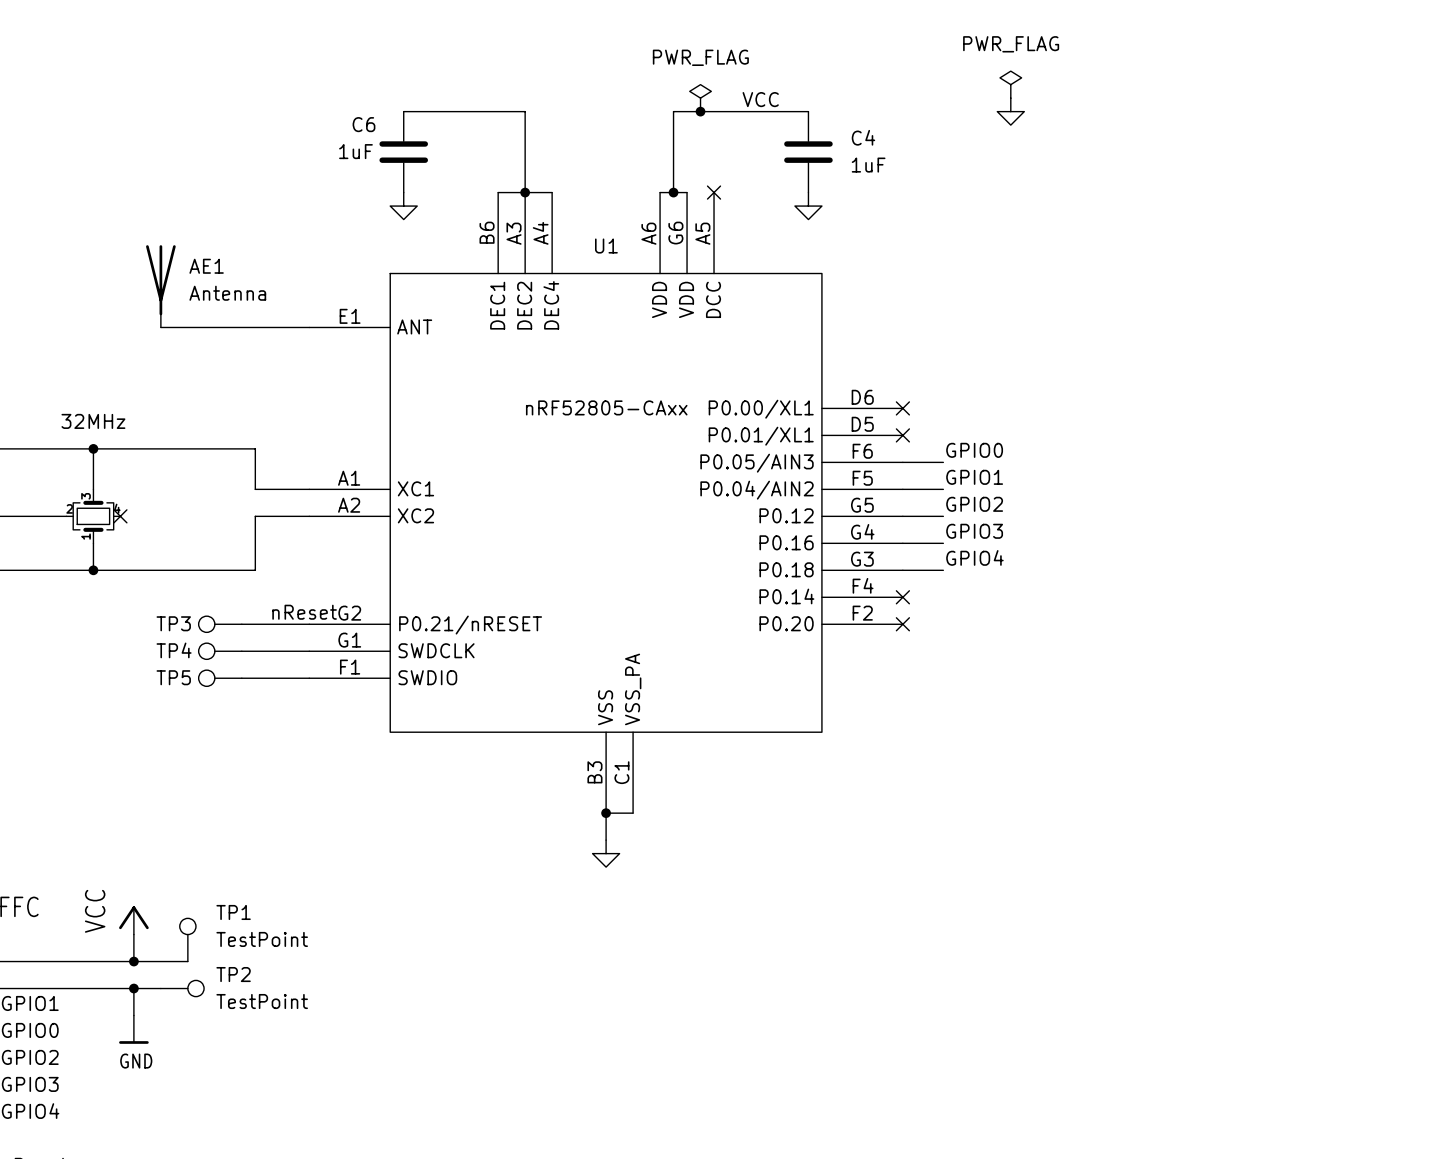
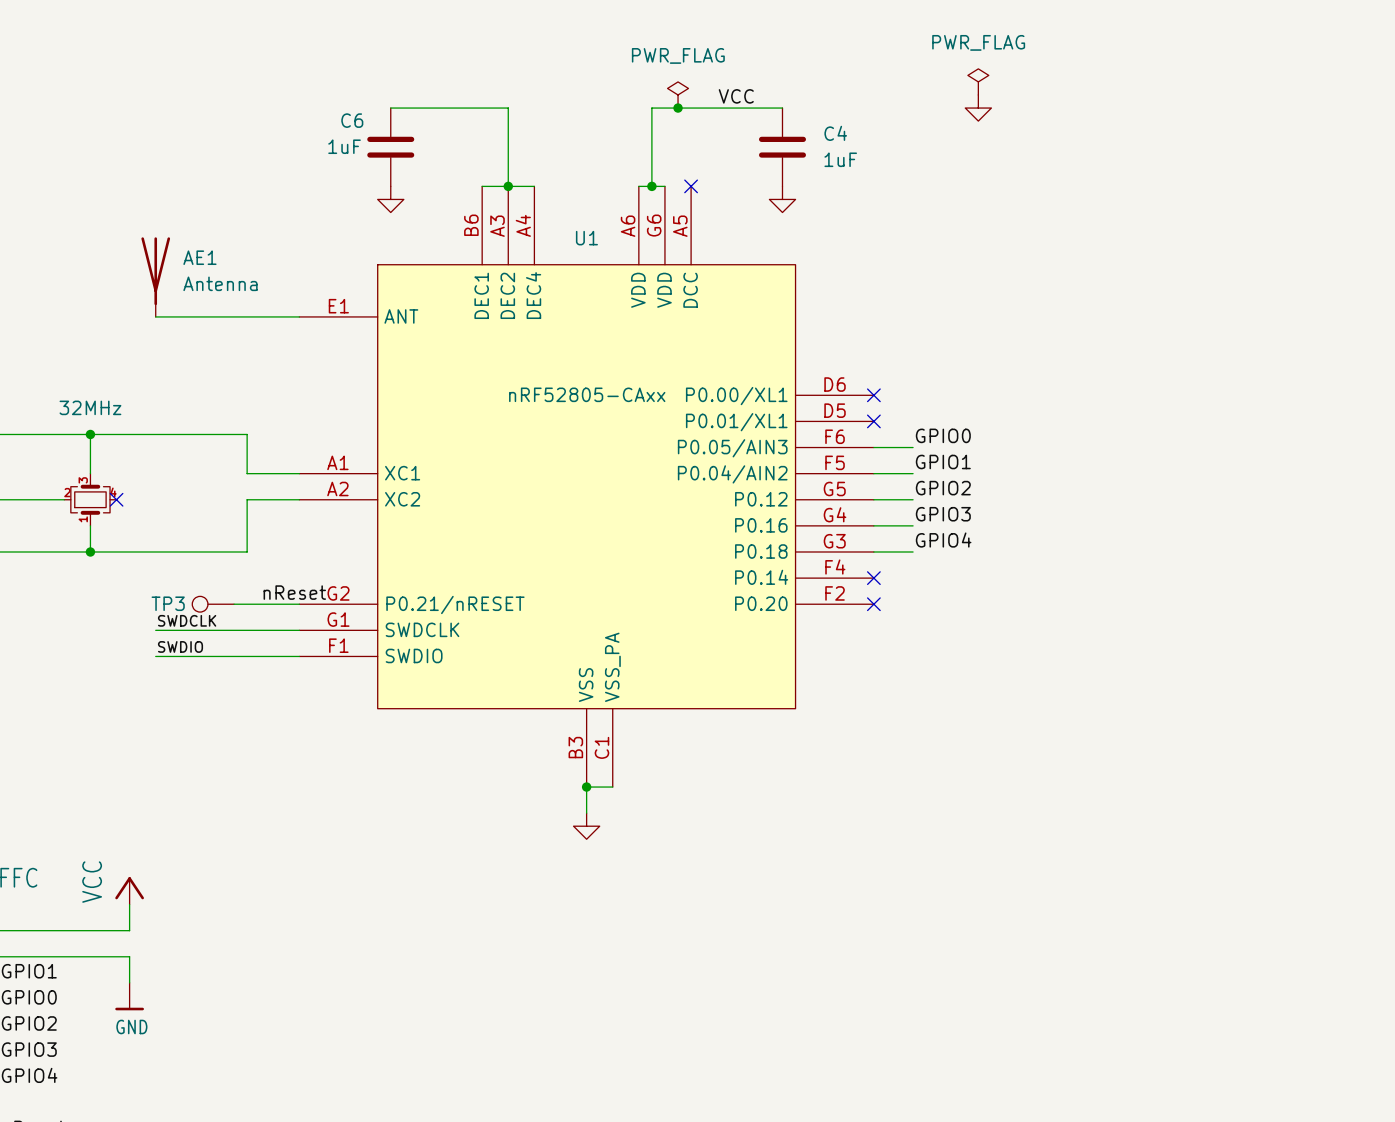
label: none -> SWDCLK (187, 620)
wire: none -> (155, 630) (234, 630)
TP4: (220, 651) -> none
label: none -> SWDIO (180, 646)
wire: none -> (155, 656) (234, 656)
TP5: (220, 678) -> none
TP1: TestPoint (187, 939) -> none
wire: (133, 961) (187, 961) -> none
junction: (133, 961) -> none
wire: (133, 988) (160, 988) -> none
junction: (133, 988) -> none
TP2: TestPoint (182, 988) -> none

